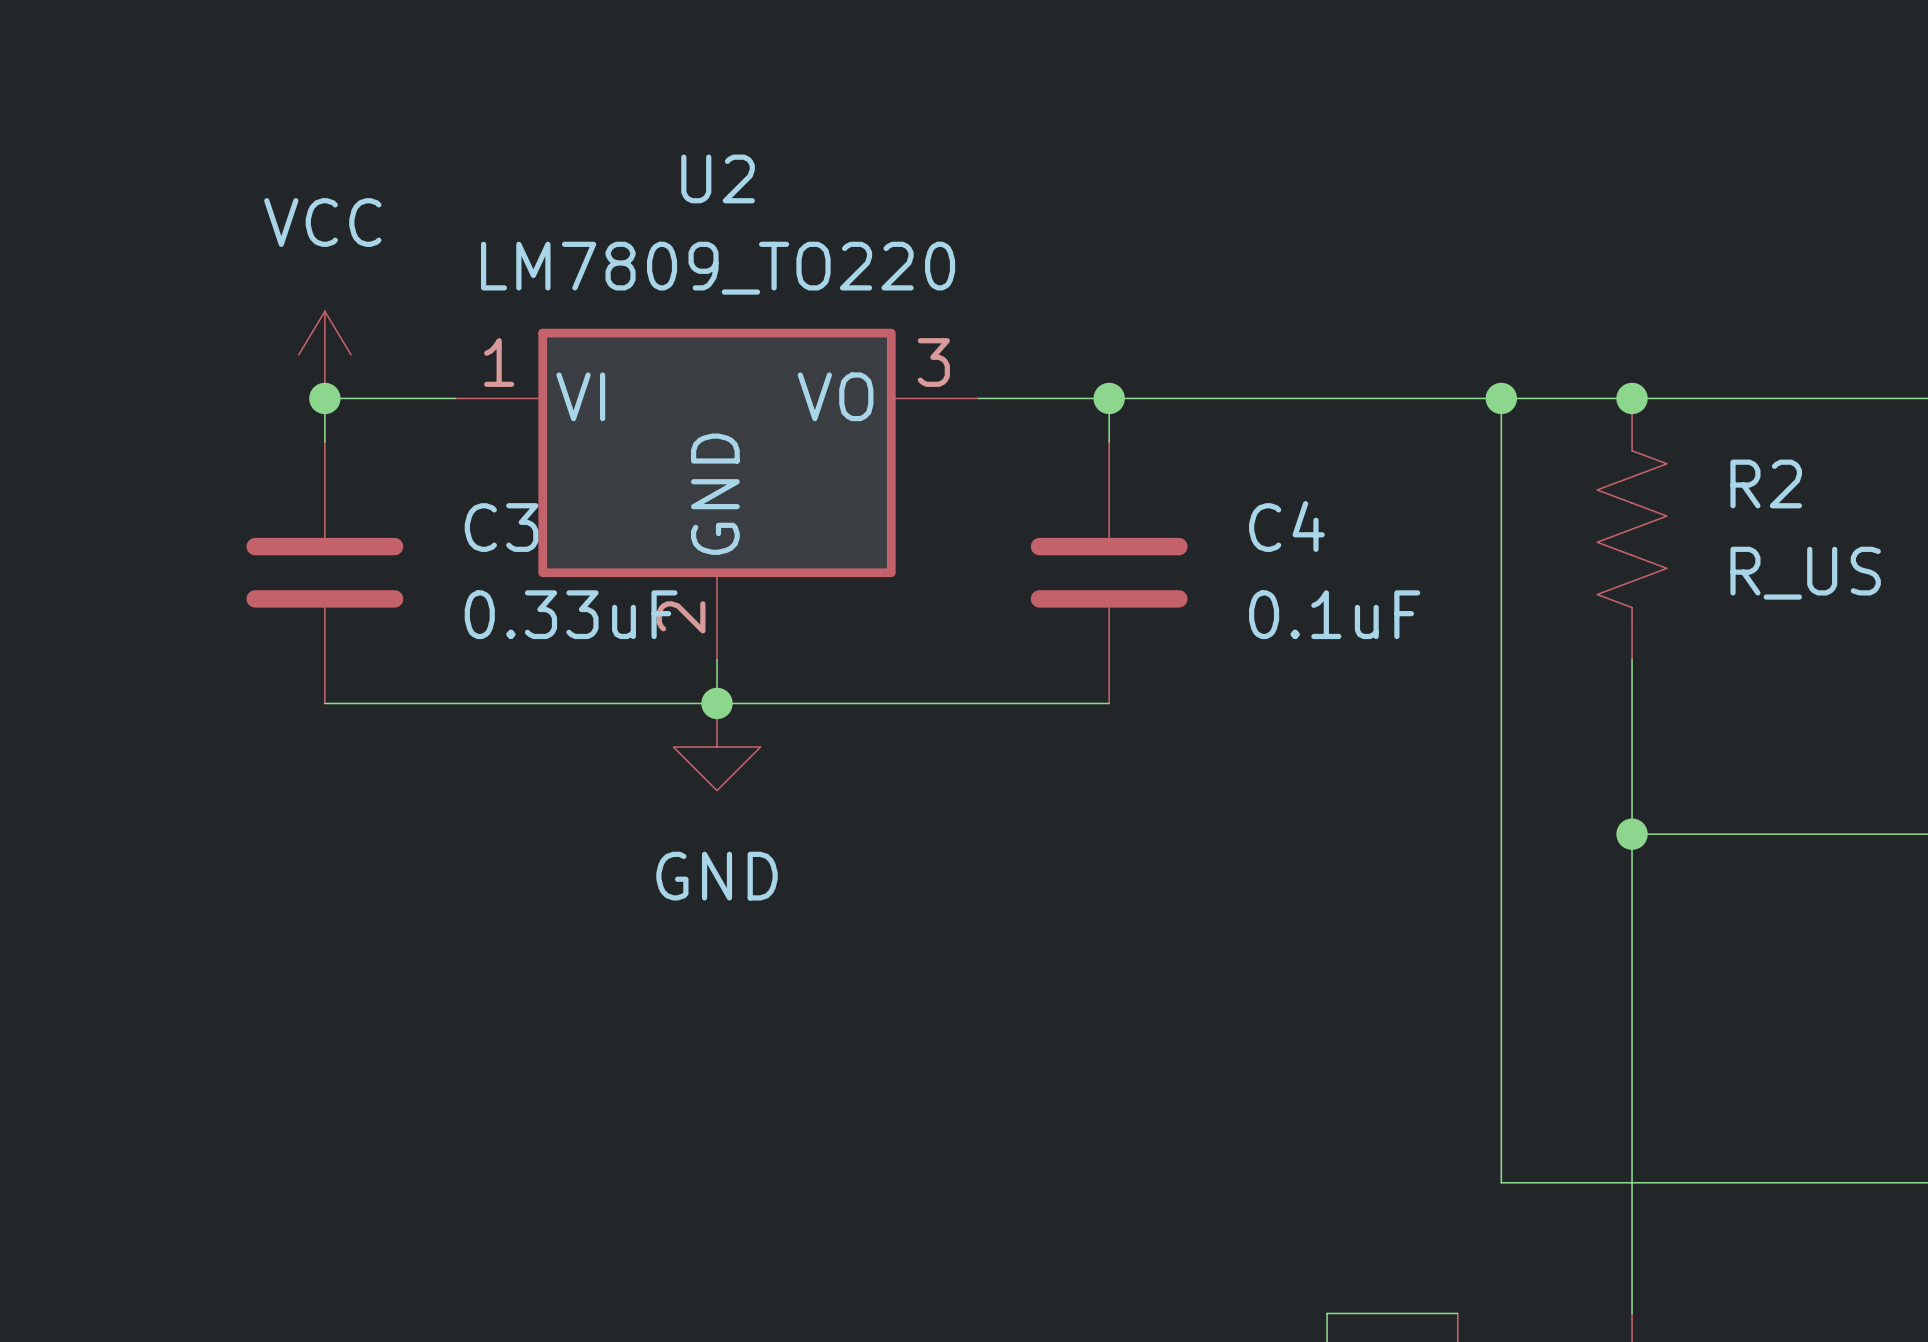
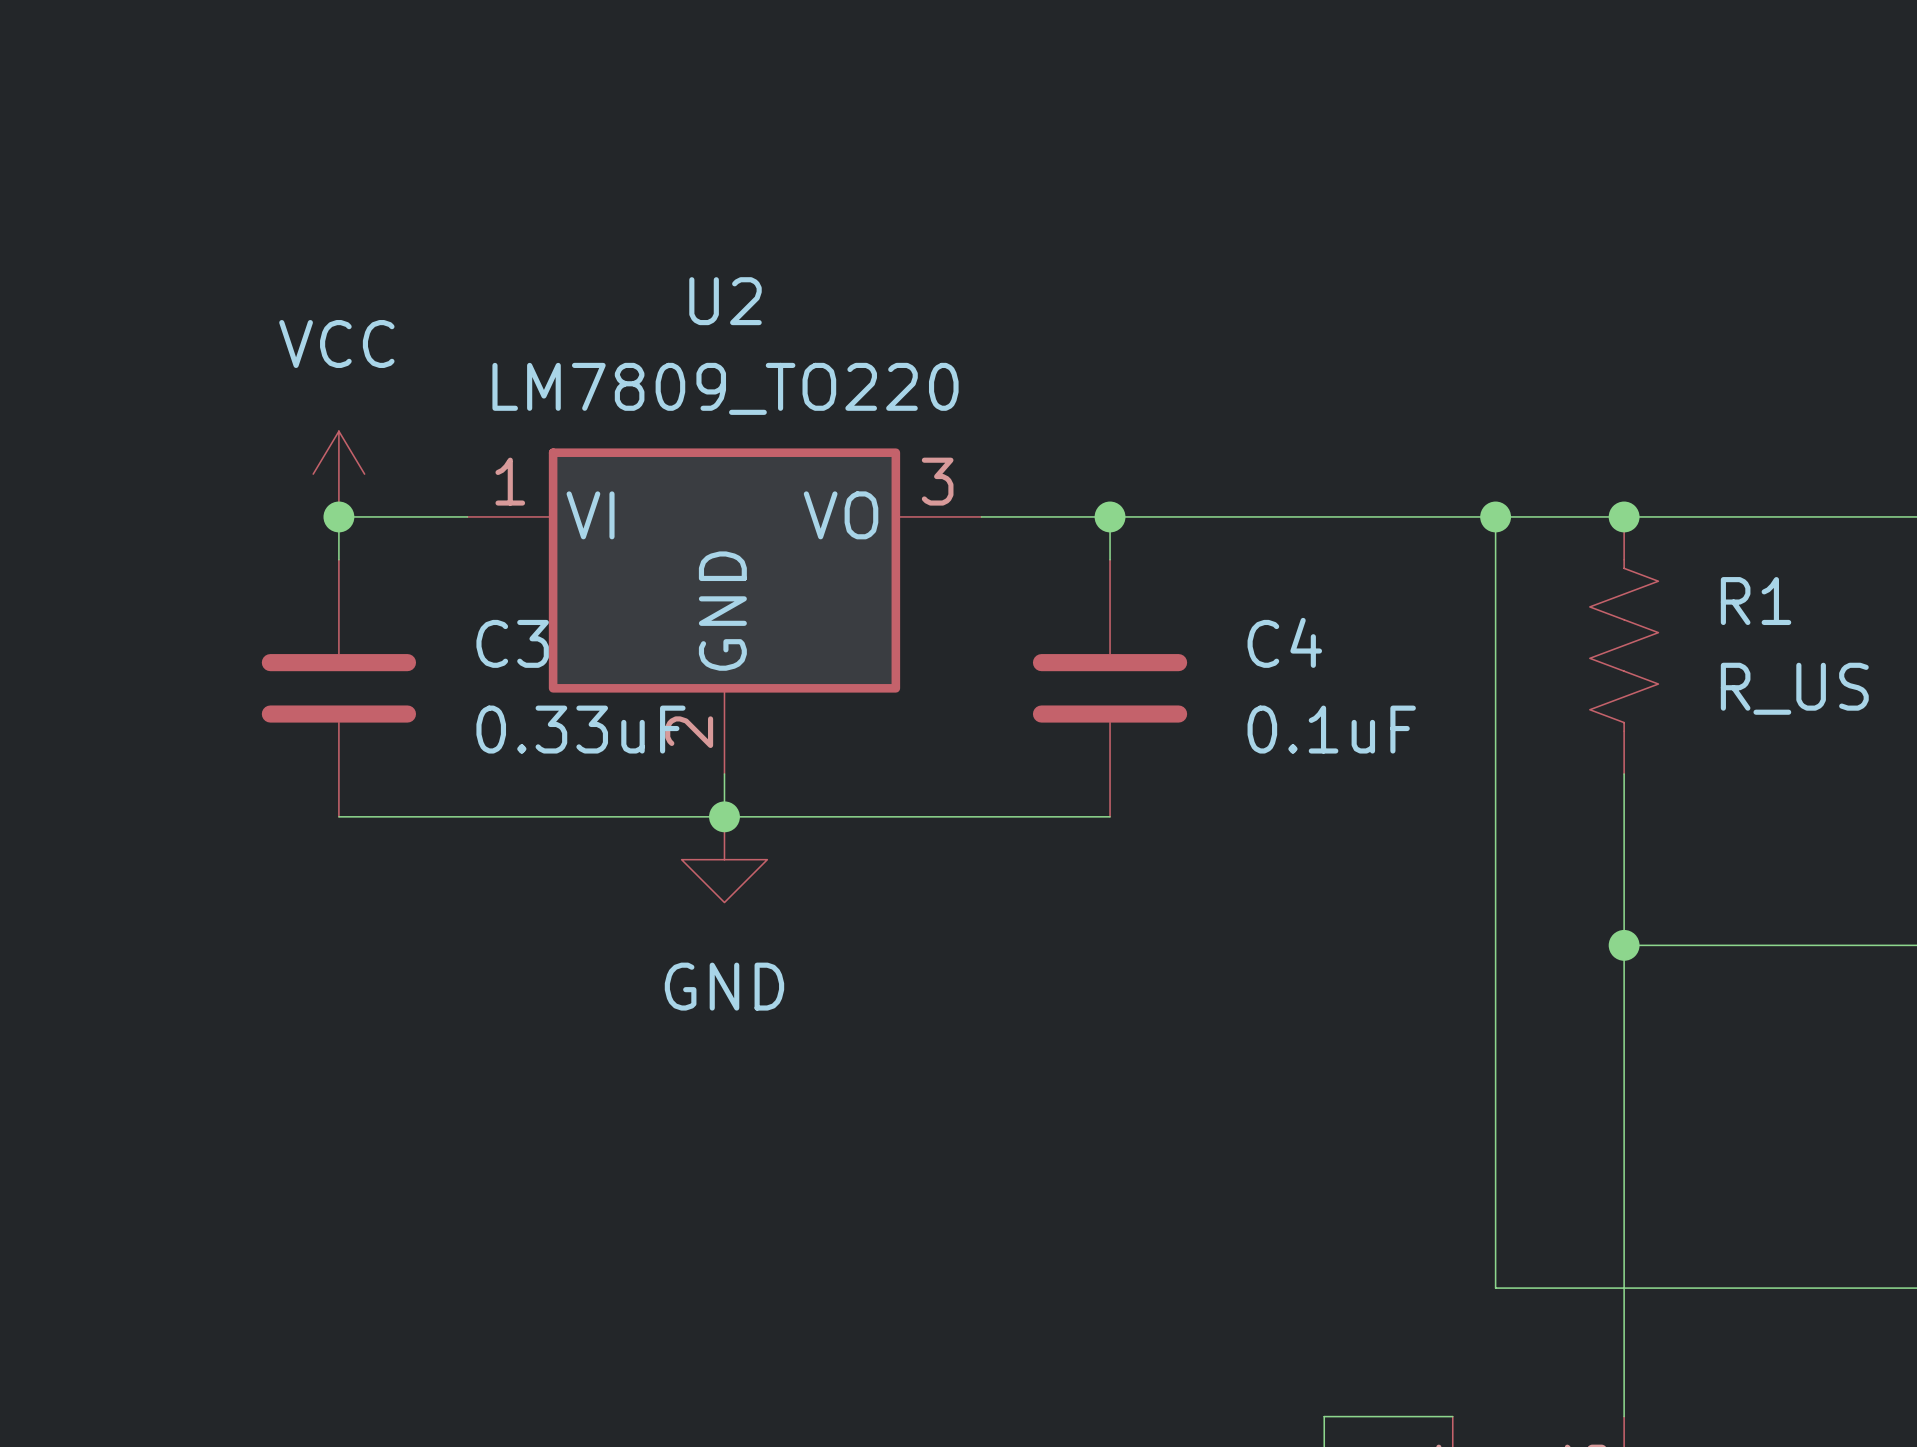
R2 name: R2 (1766, 483) -> R1 (1756, 601)

